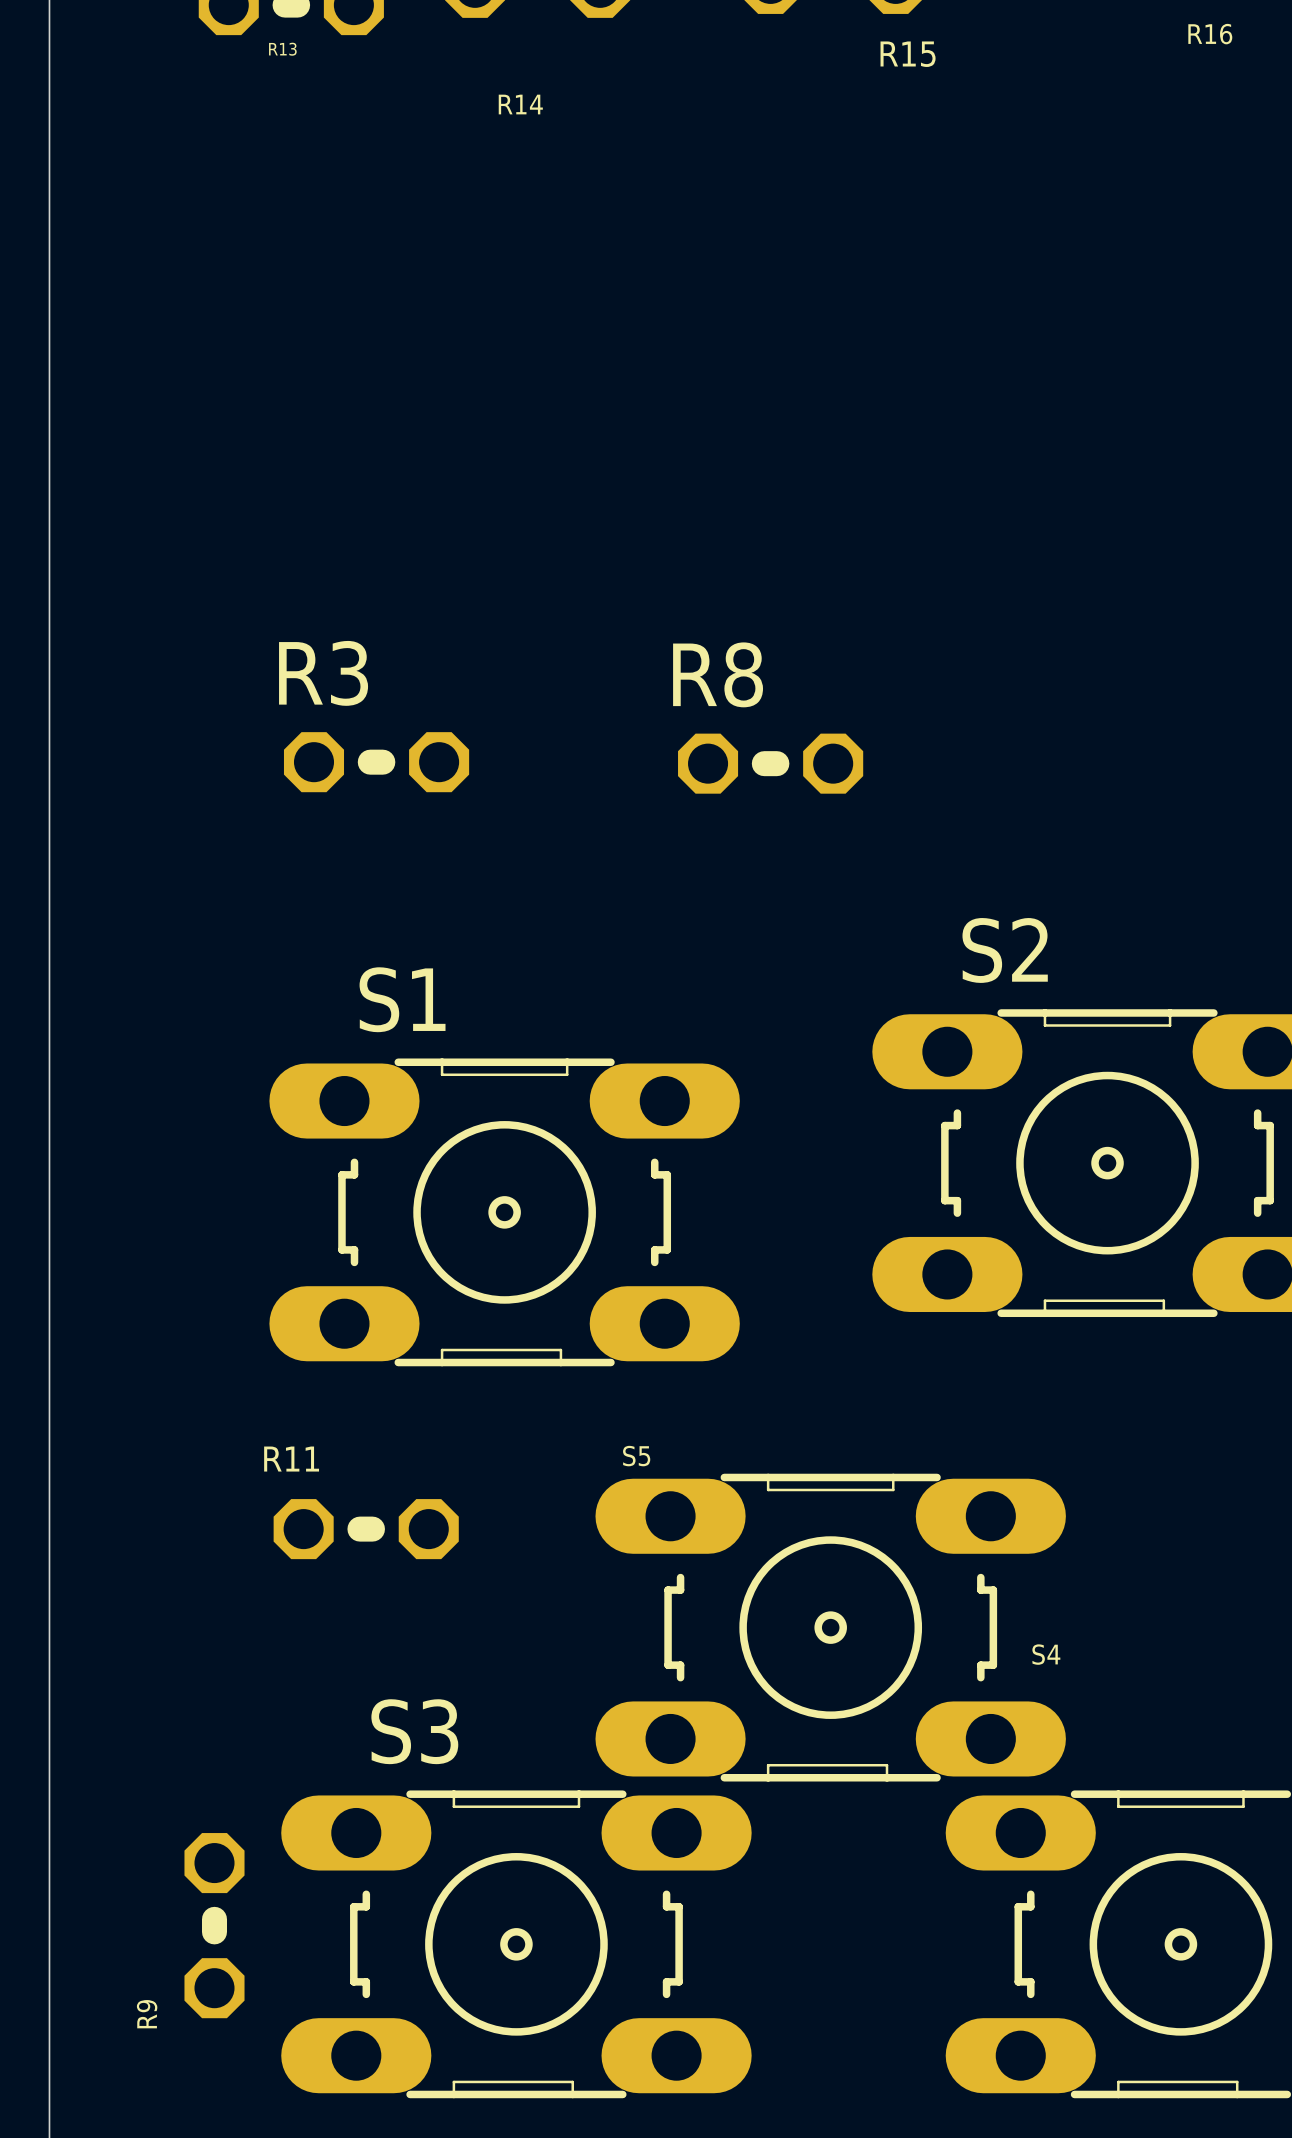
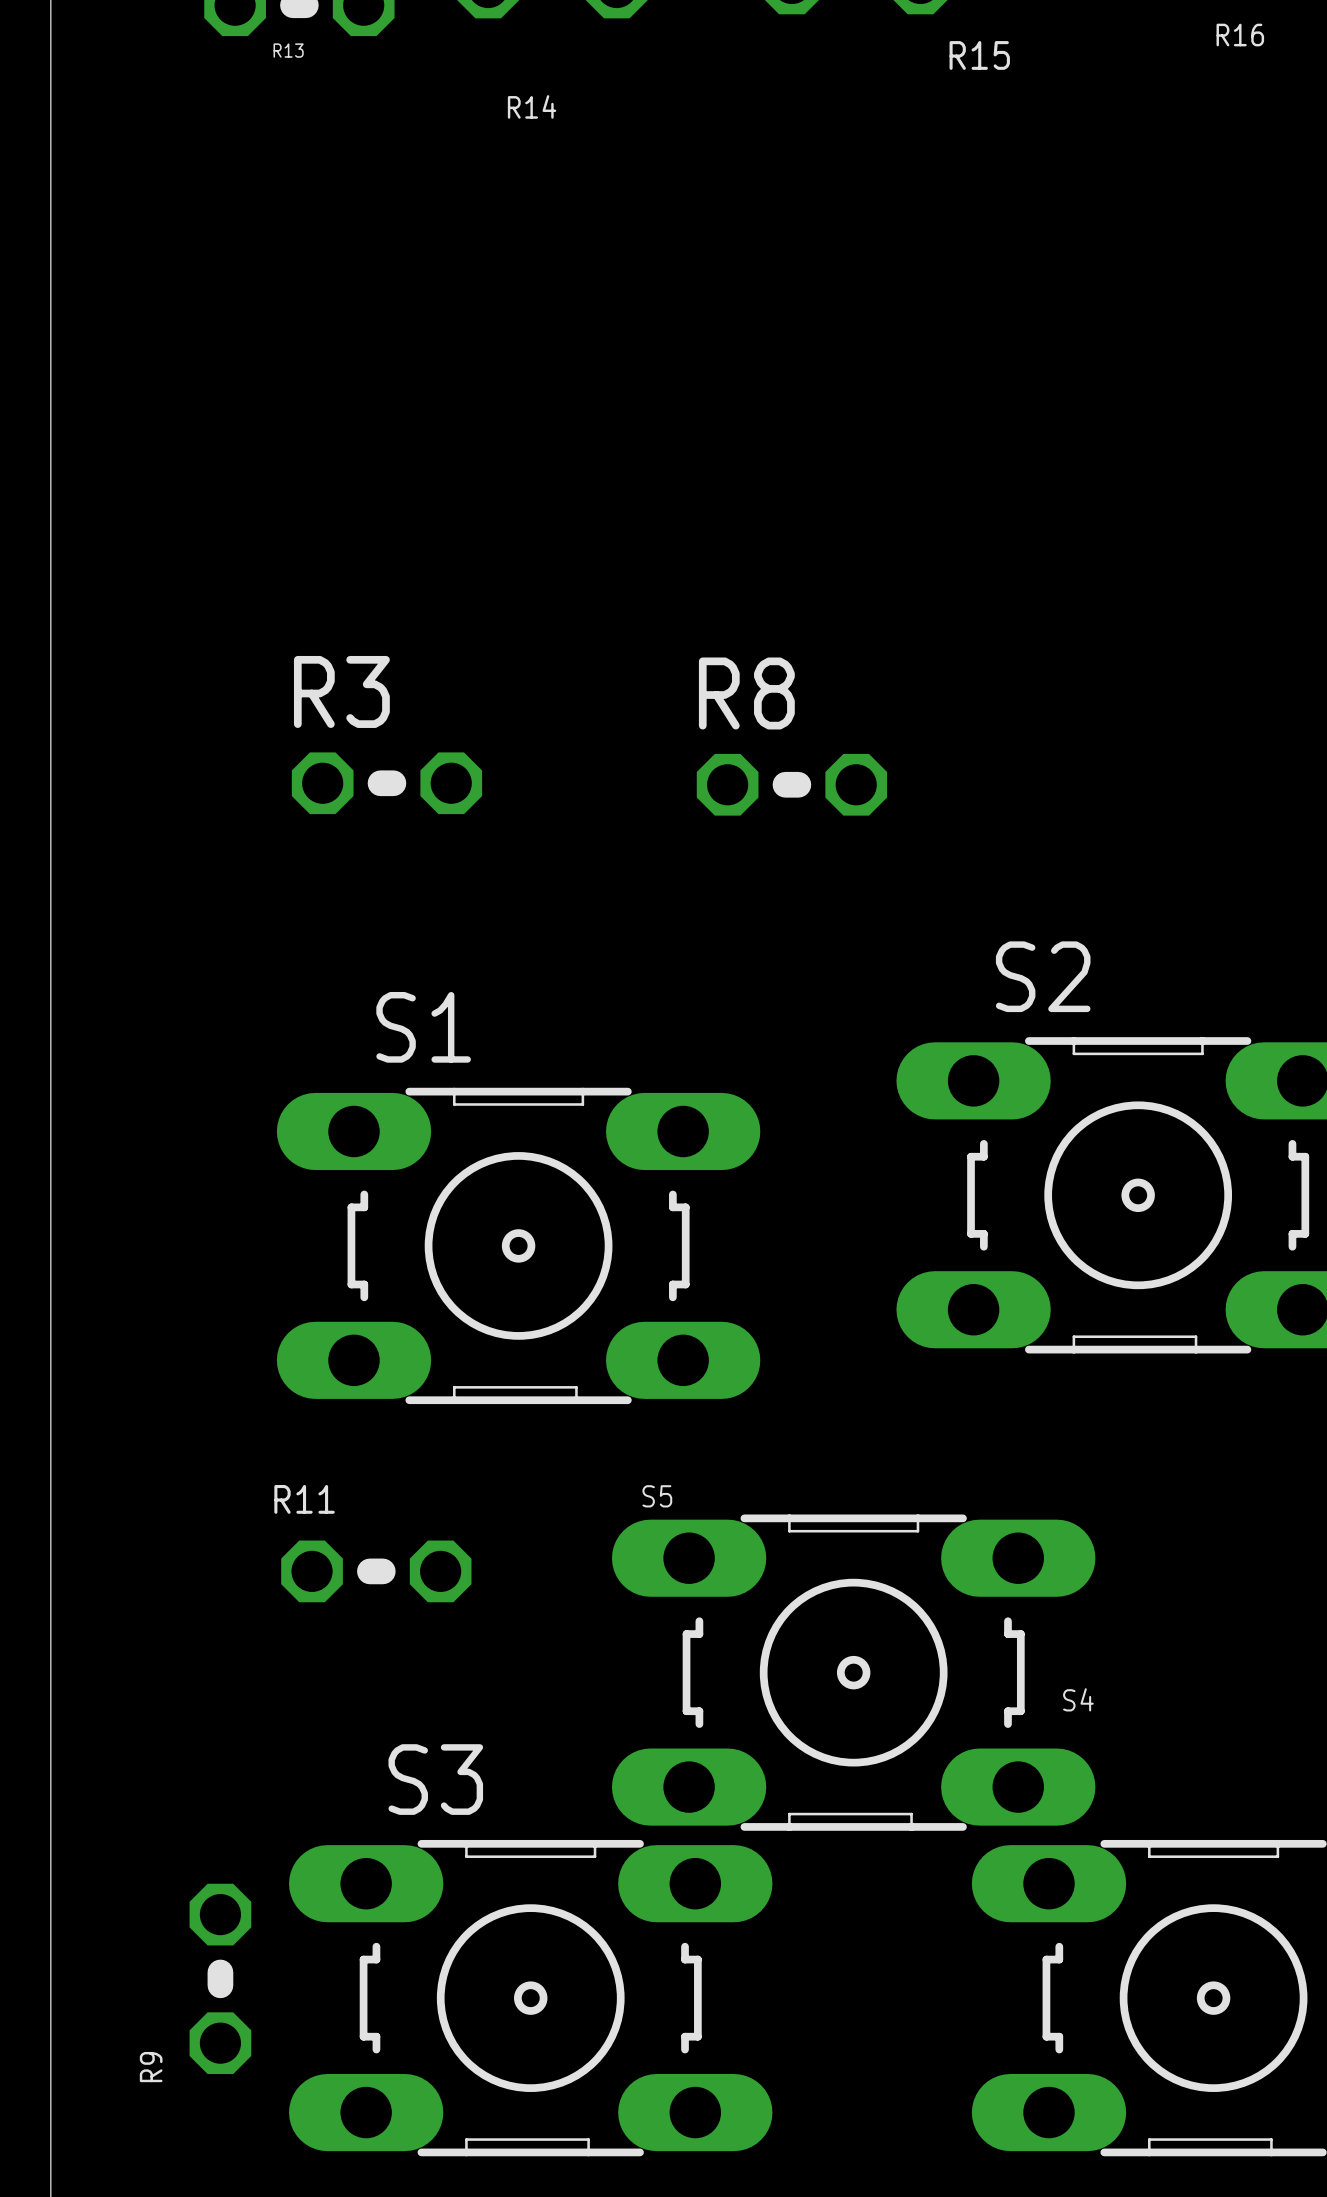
R15 name position: R15 (908, 54) -> R15 (979, 55)

